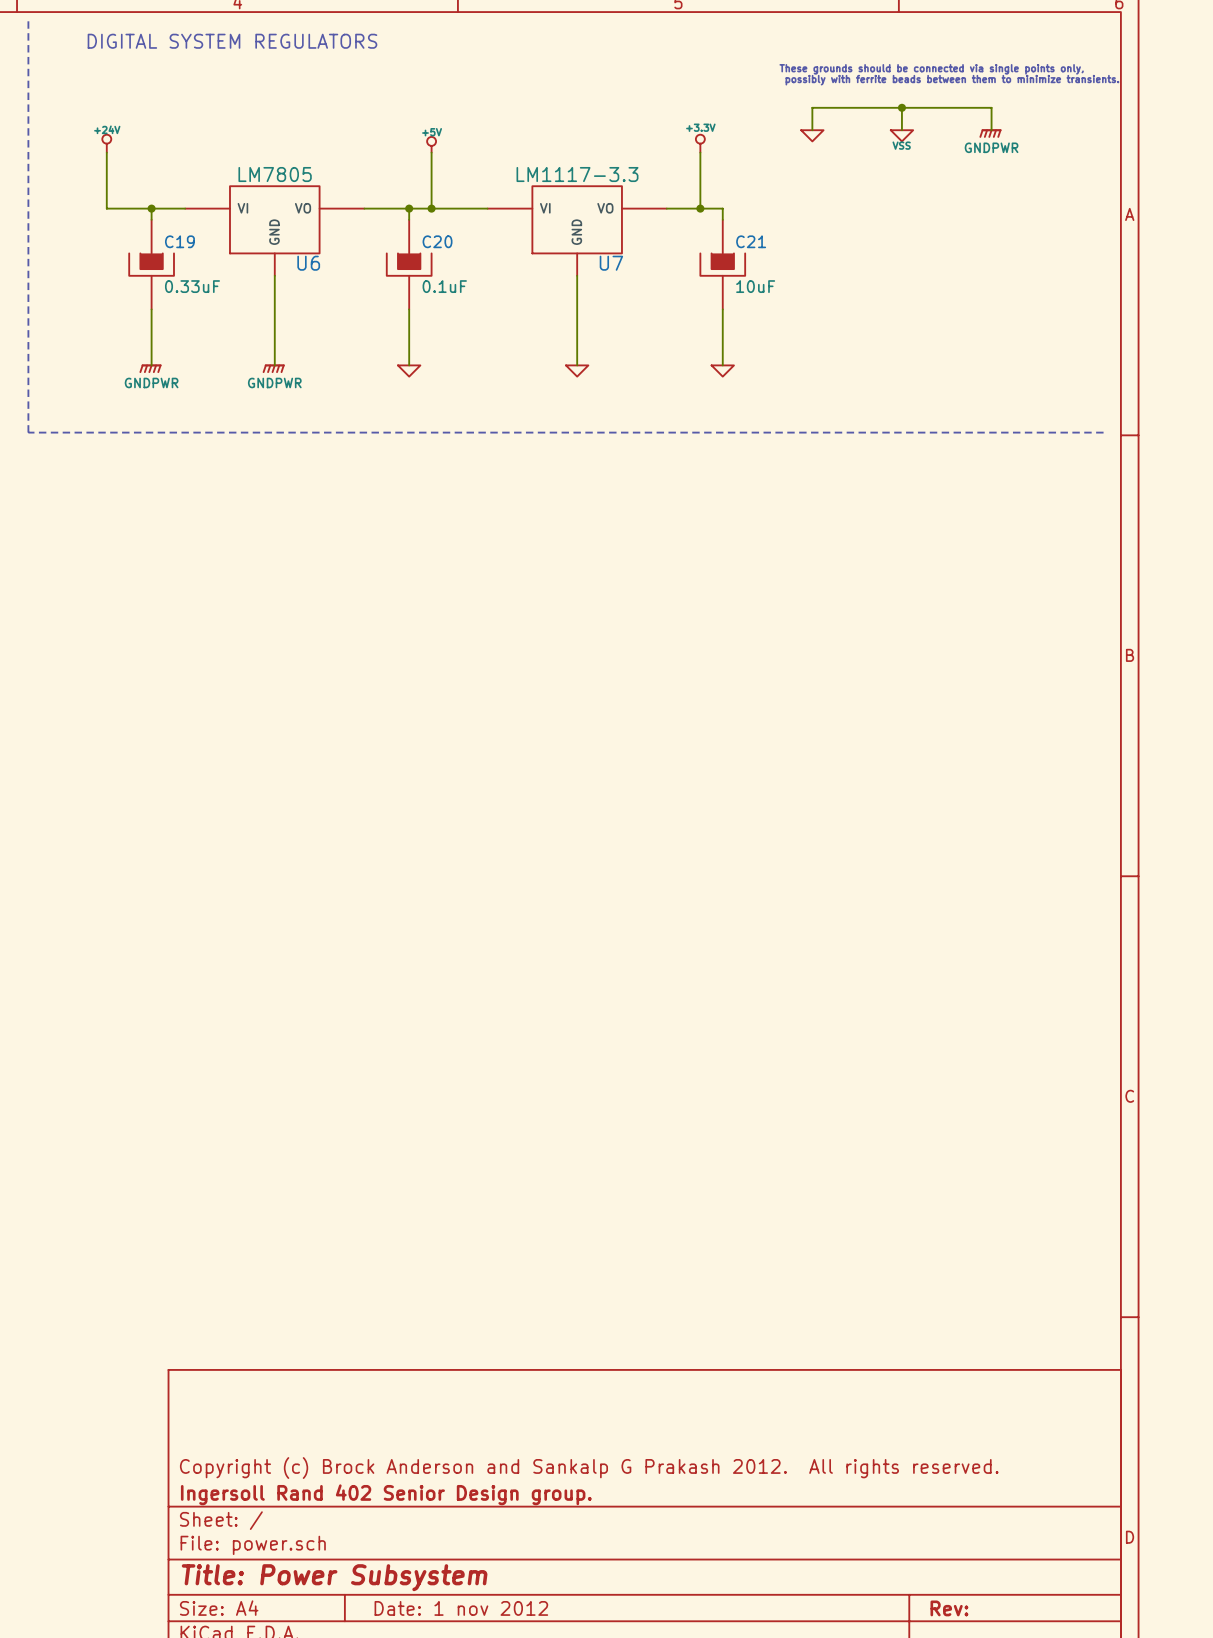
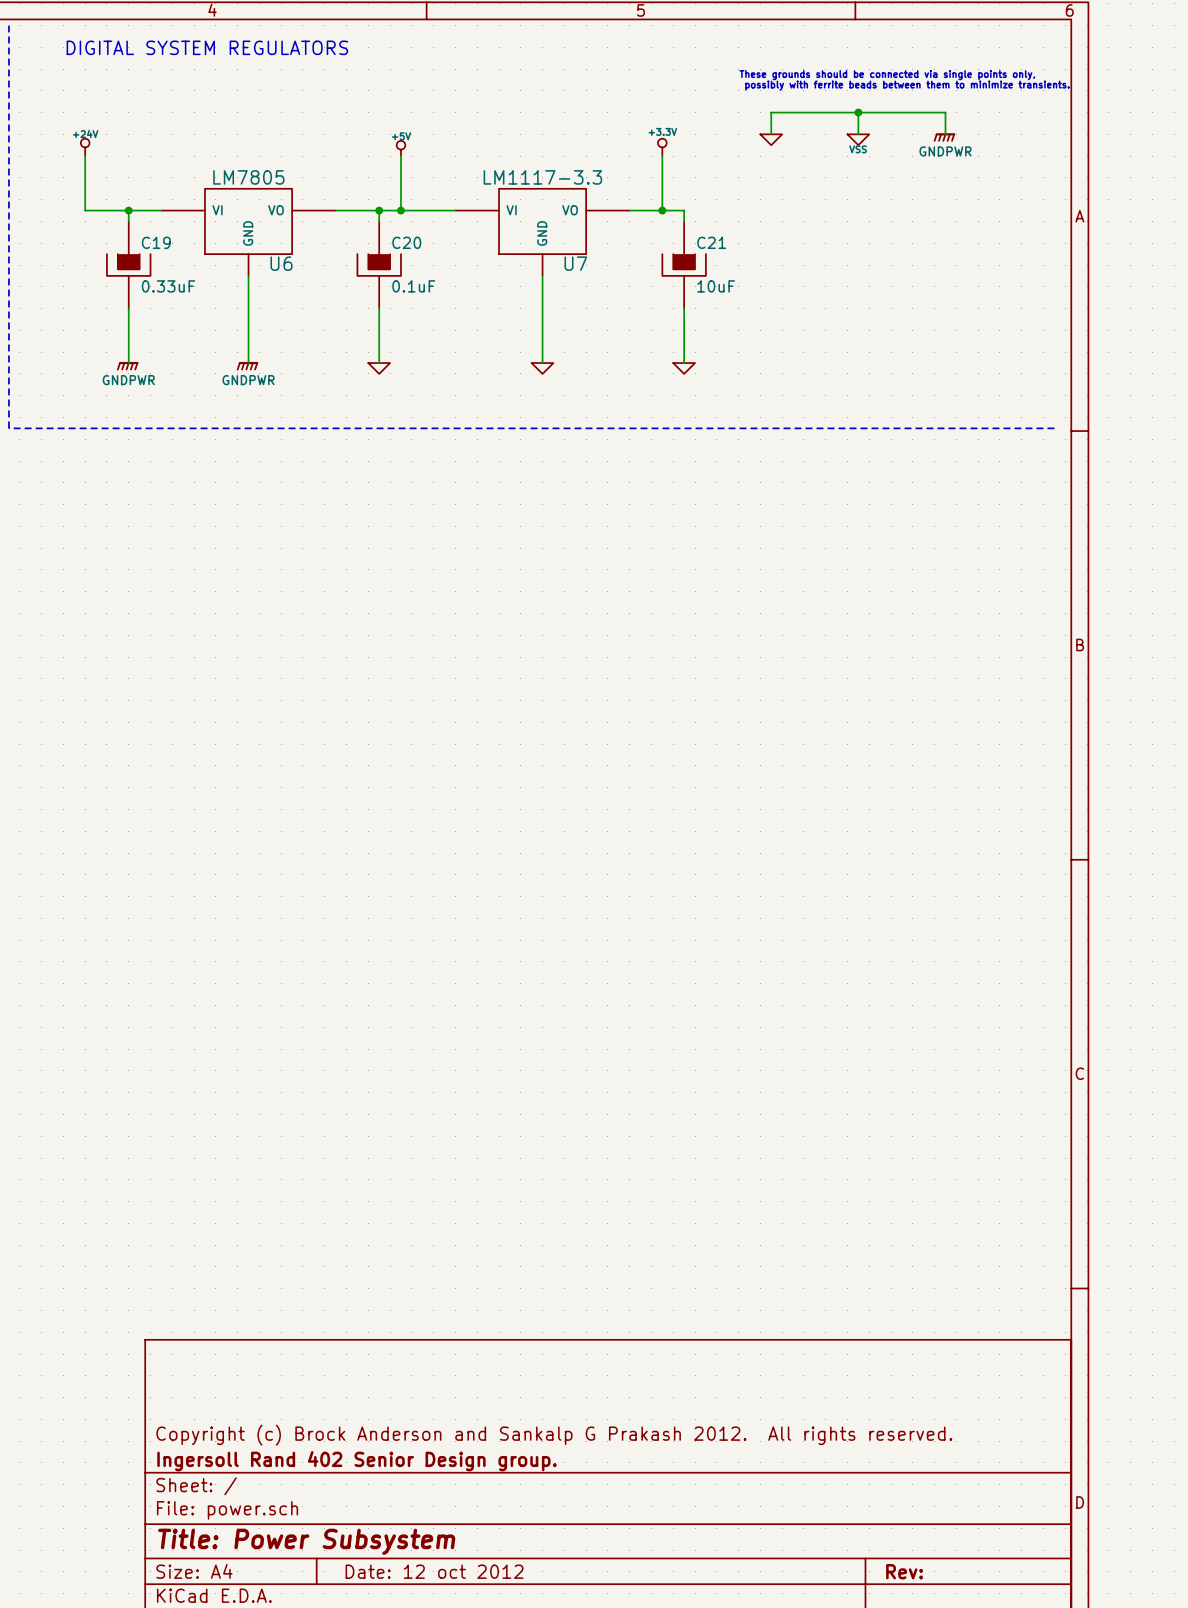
title block: Date: 1 nov 2012 (461, 1608) -> Date: 12 oct 2012 (434, 1571)

